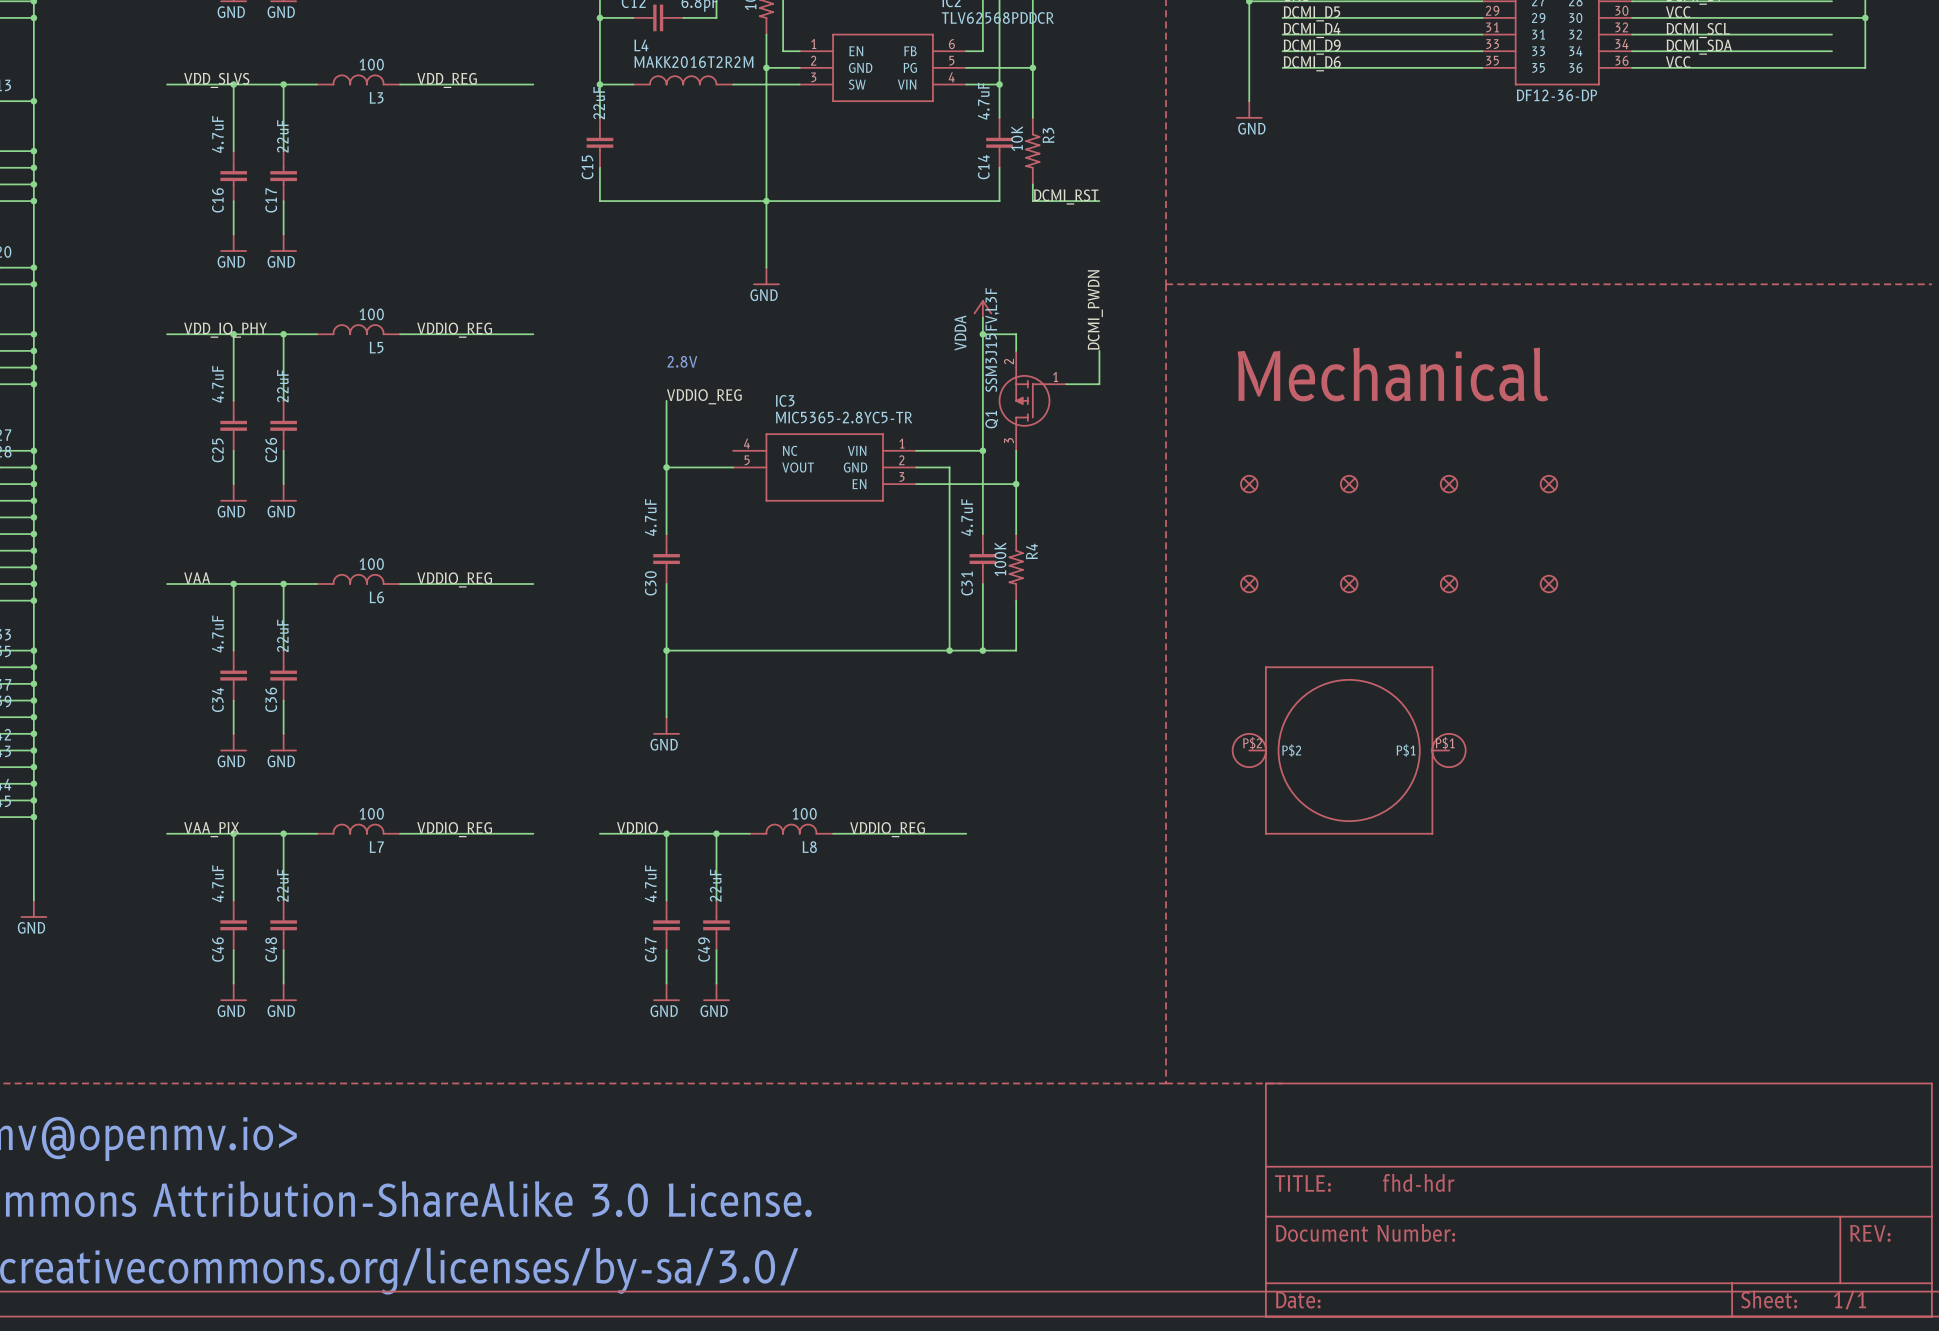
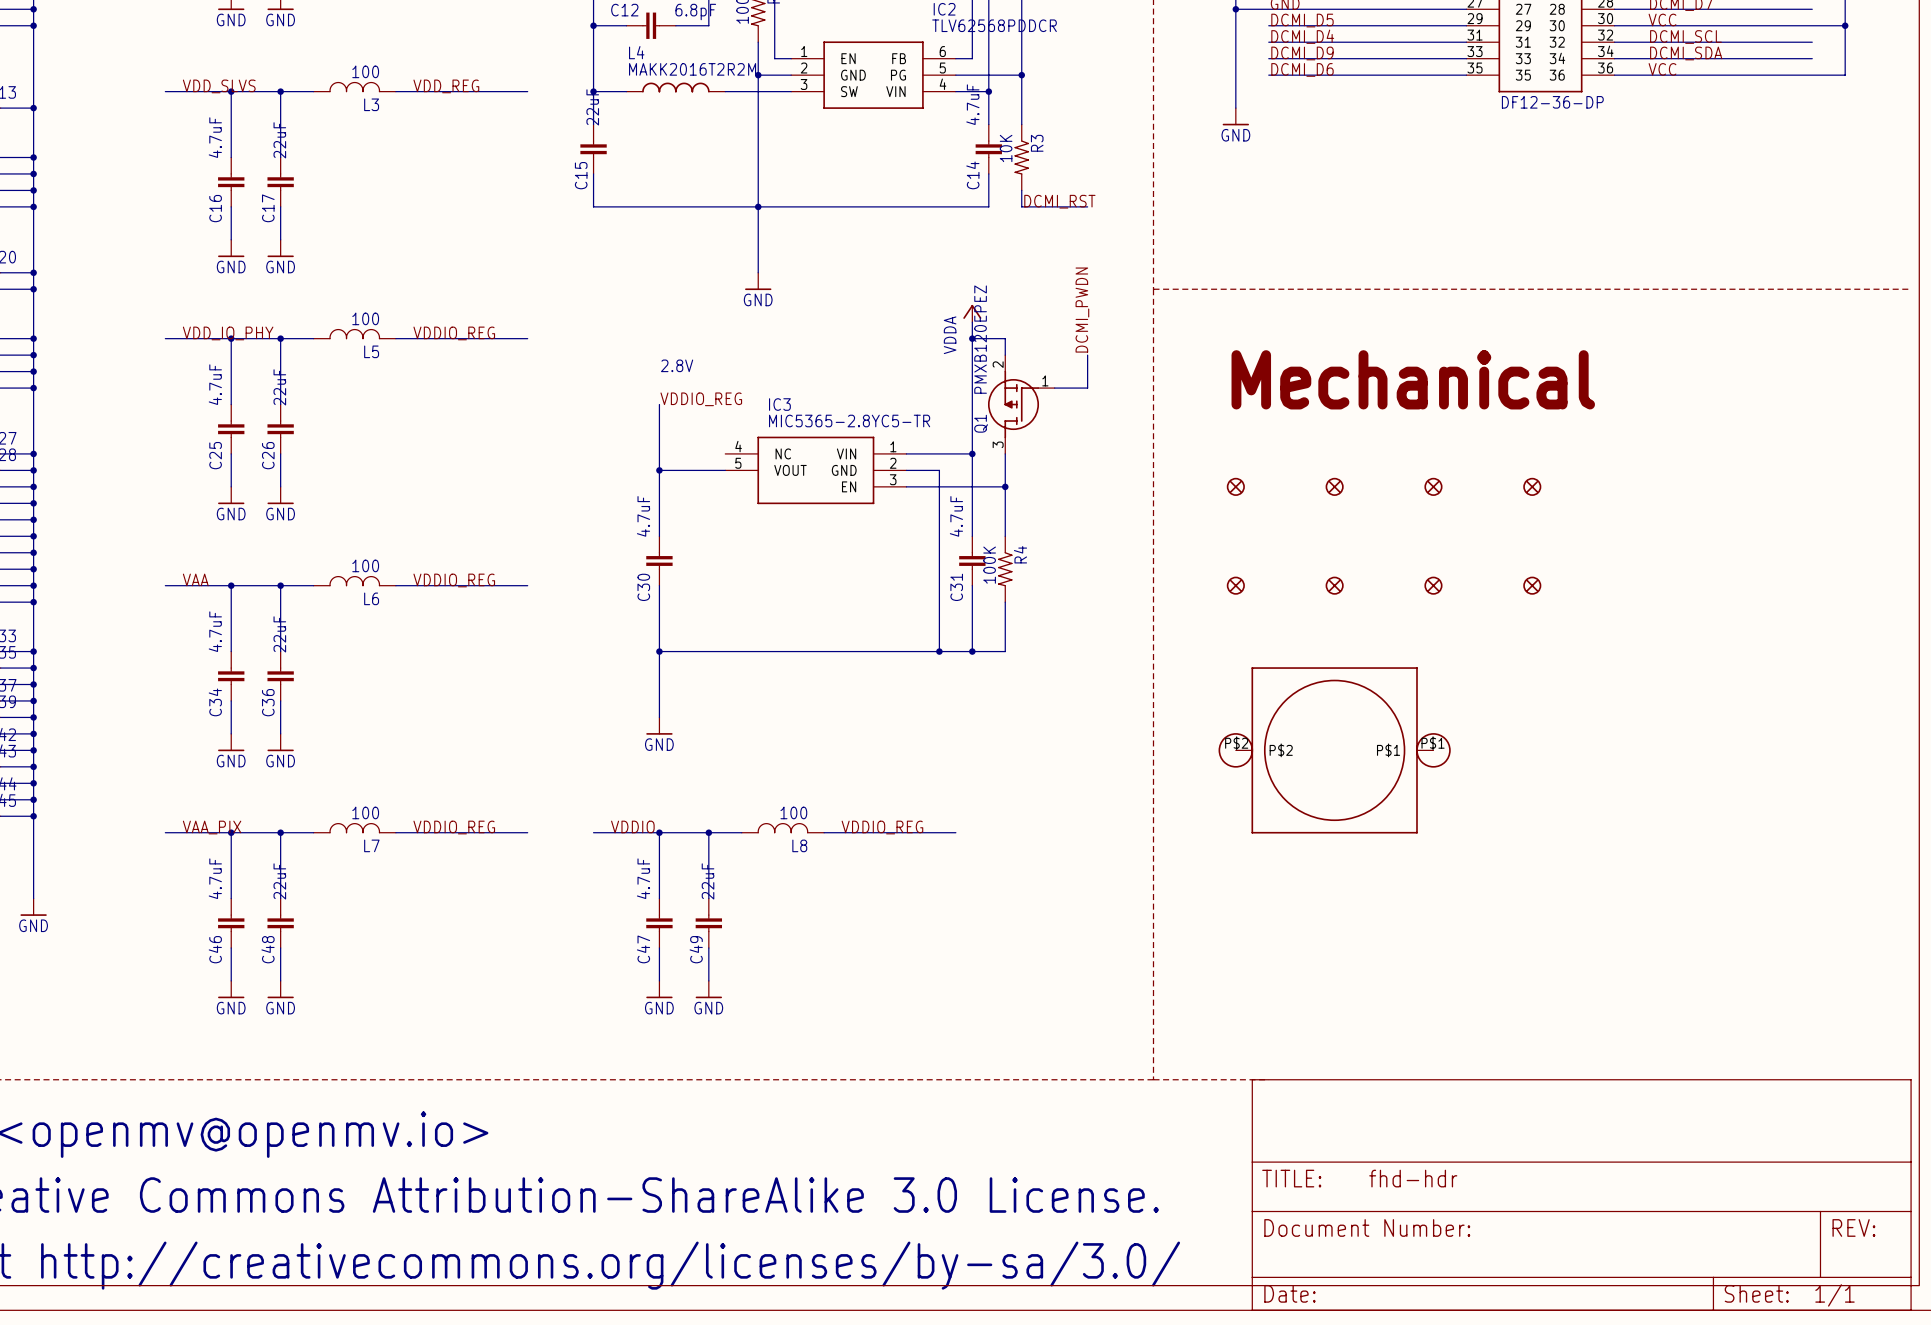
Q1 value: SSM3J15FV,L3F (992, 340) -> PMXB120EPEZ (980, 339)

